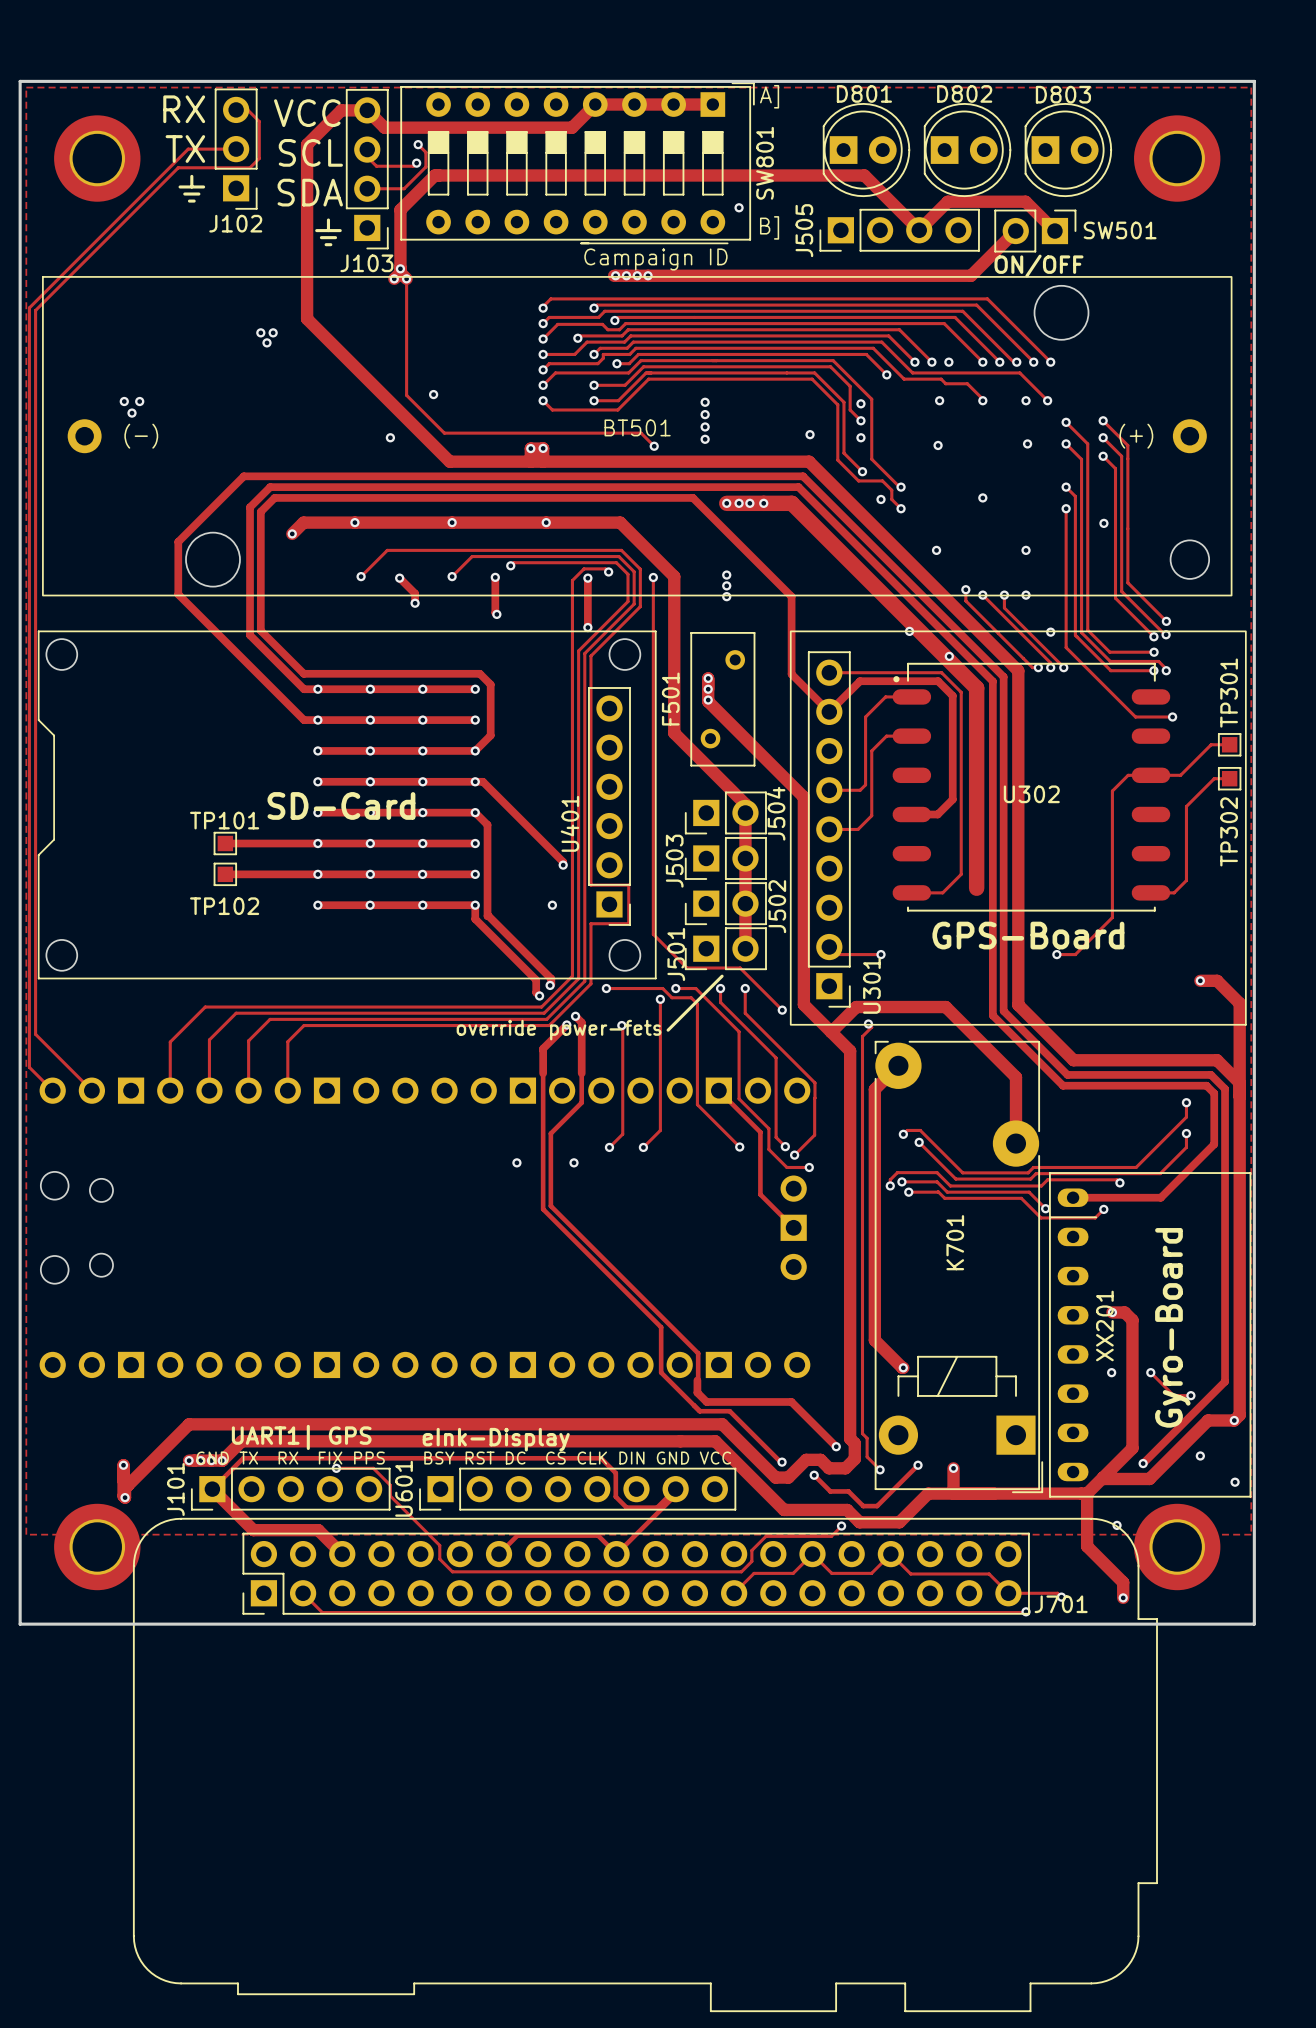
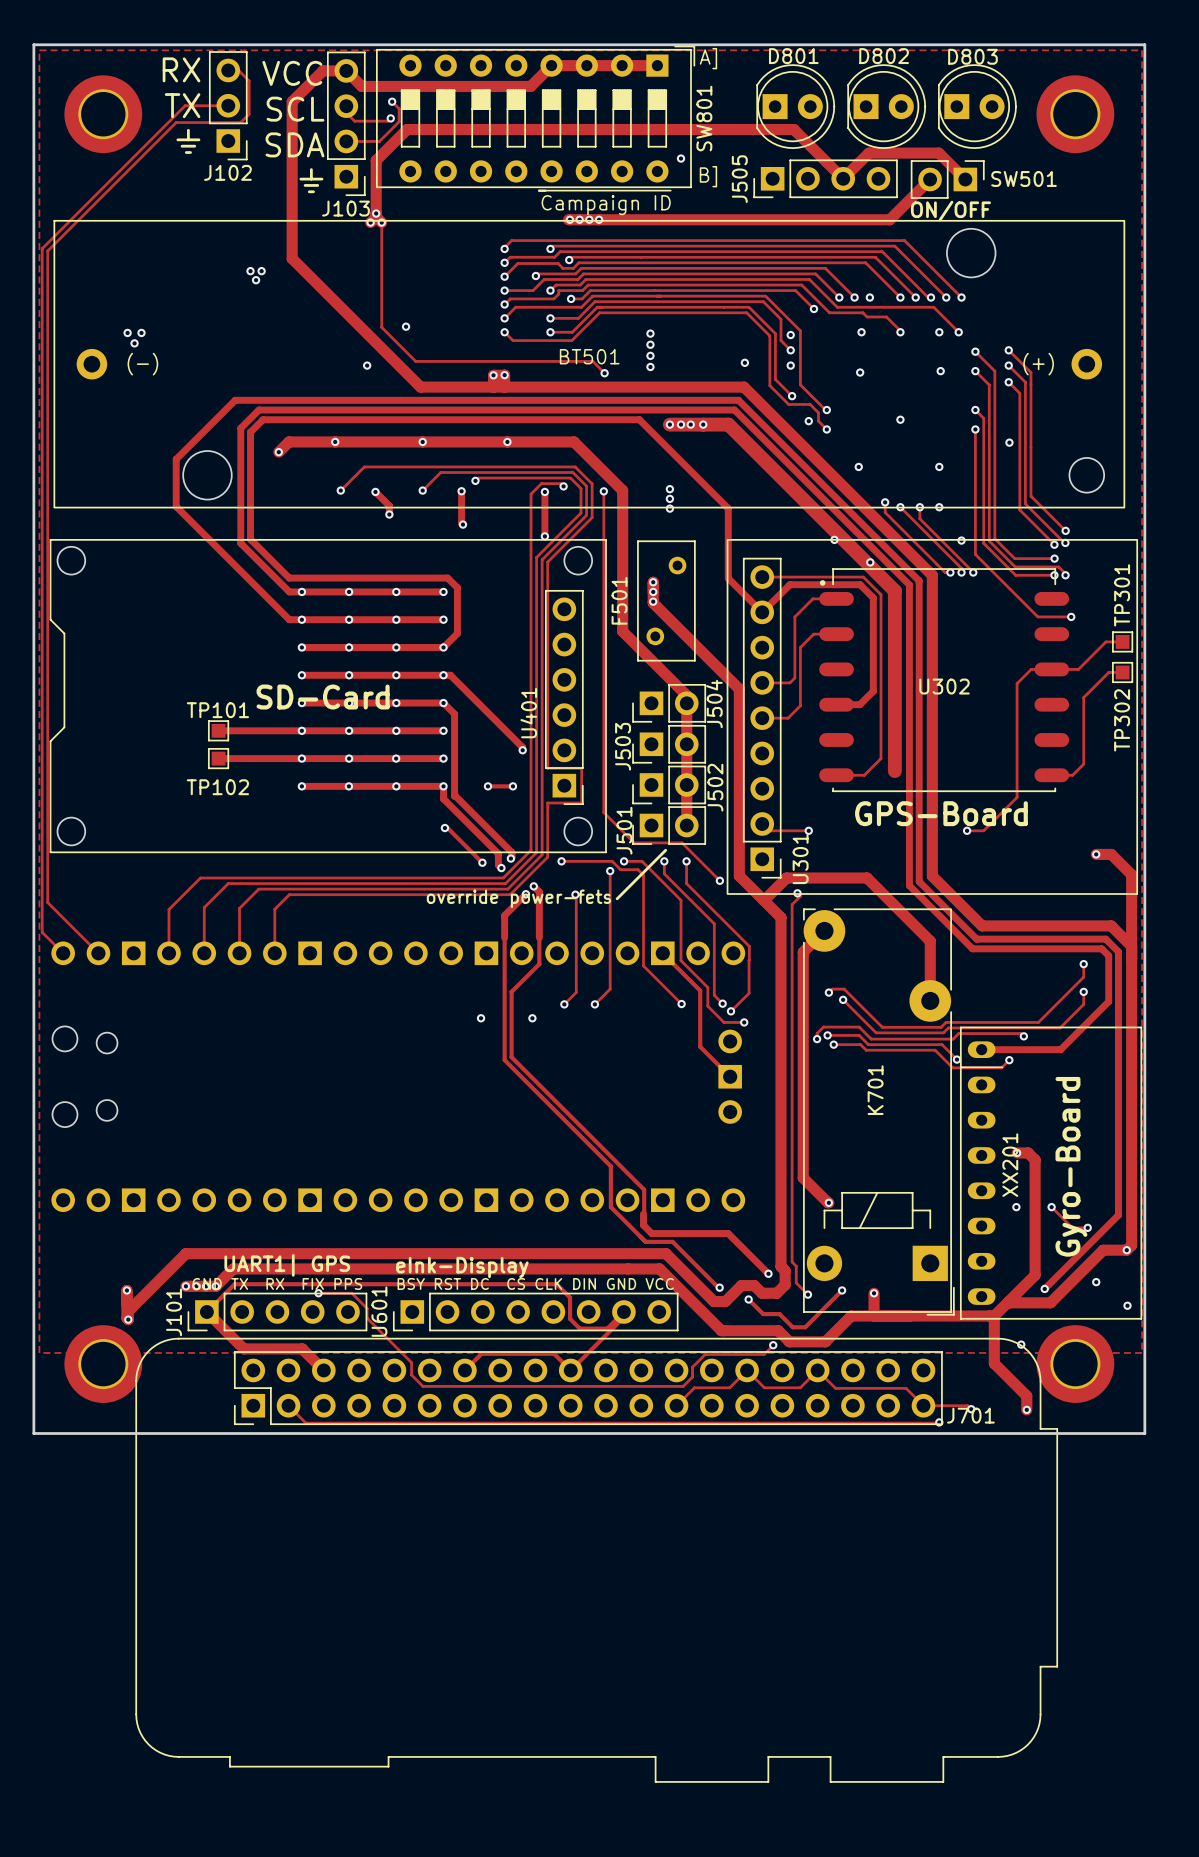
track: none -> (487, 786) (512, 786)
via: none -> (487, 786)
track: none -> (444, 828) (447, 828) (482, 862)
via: none -> (444, 828)
via: none -> (482, 862)

